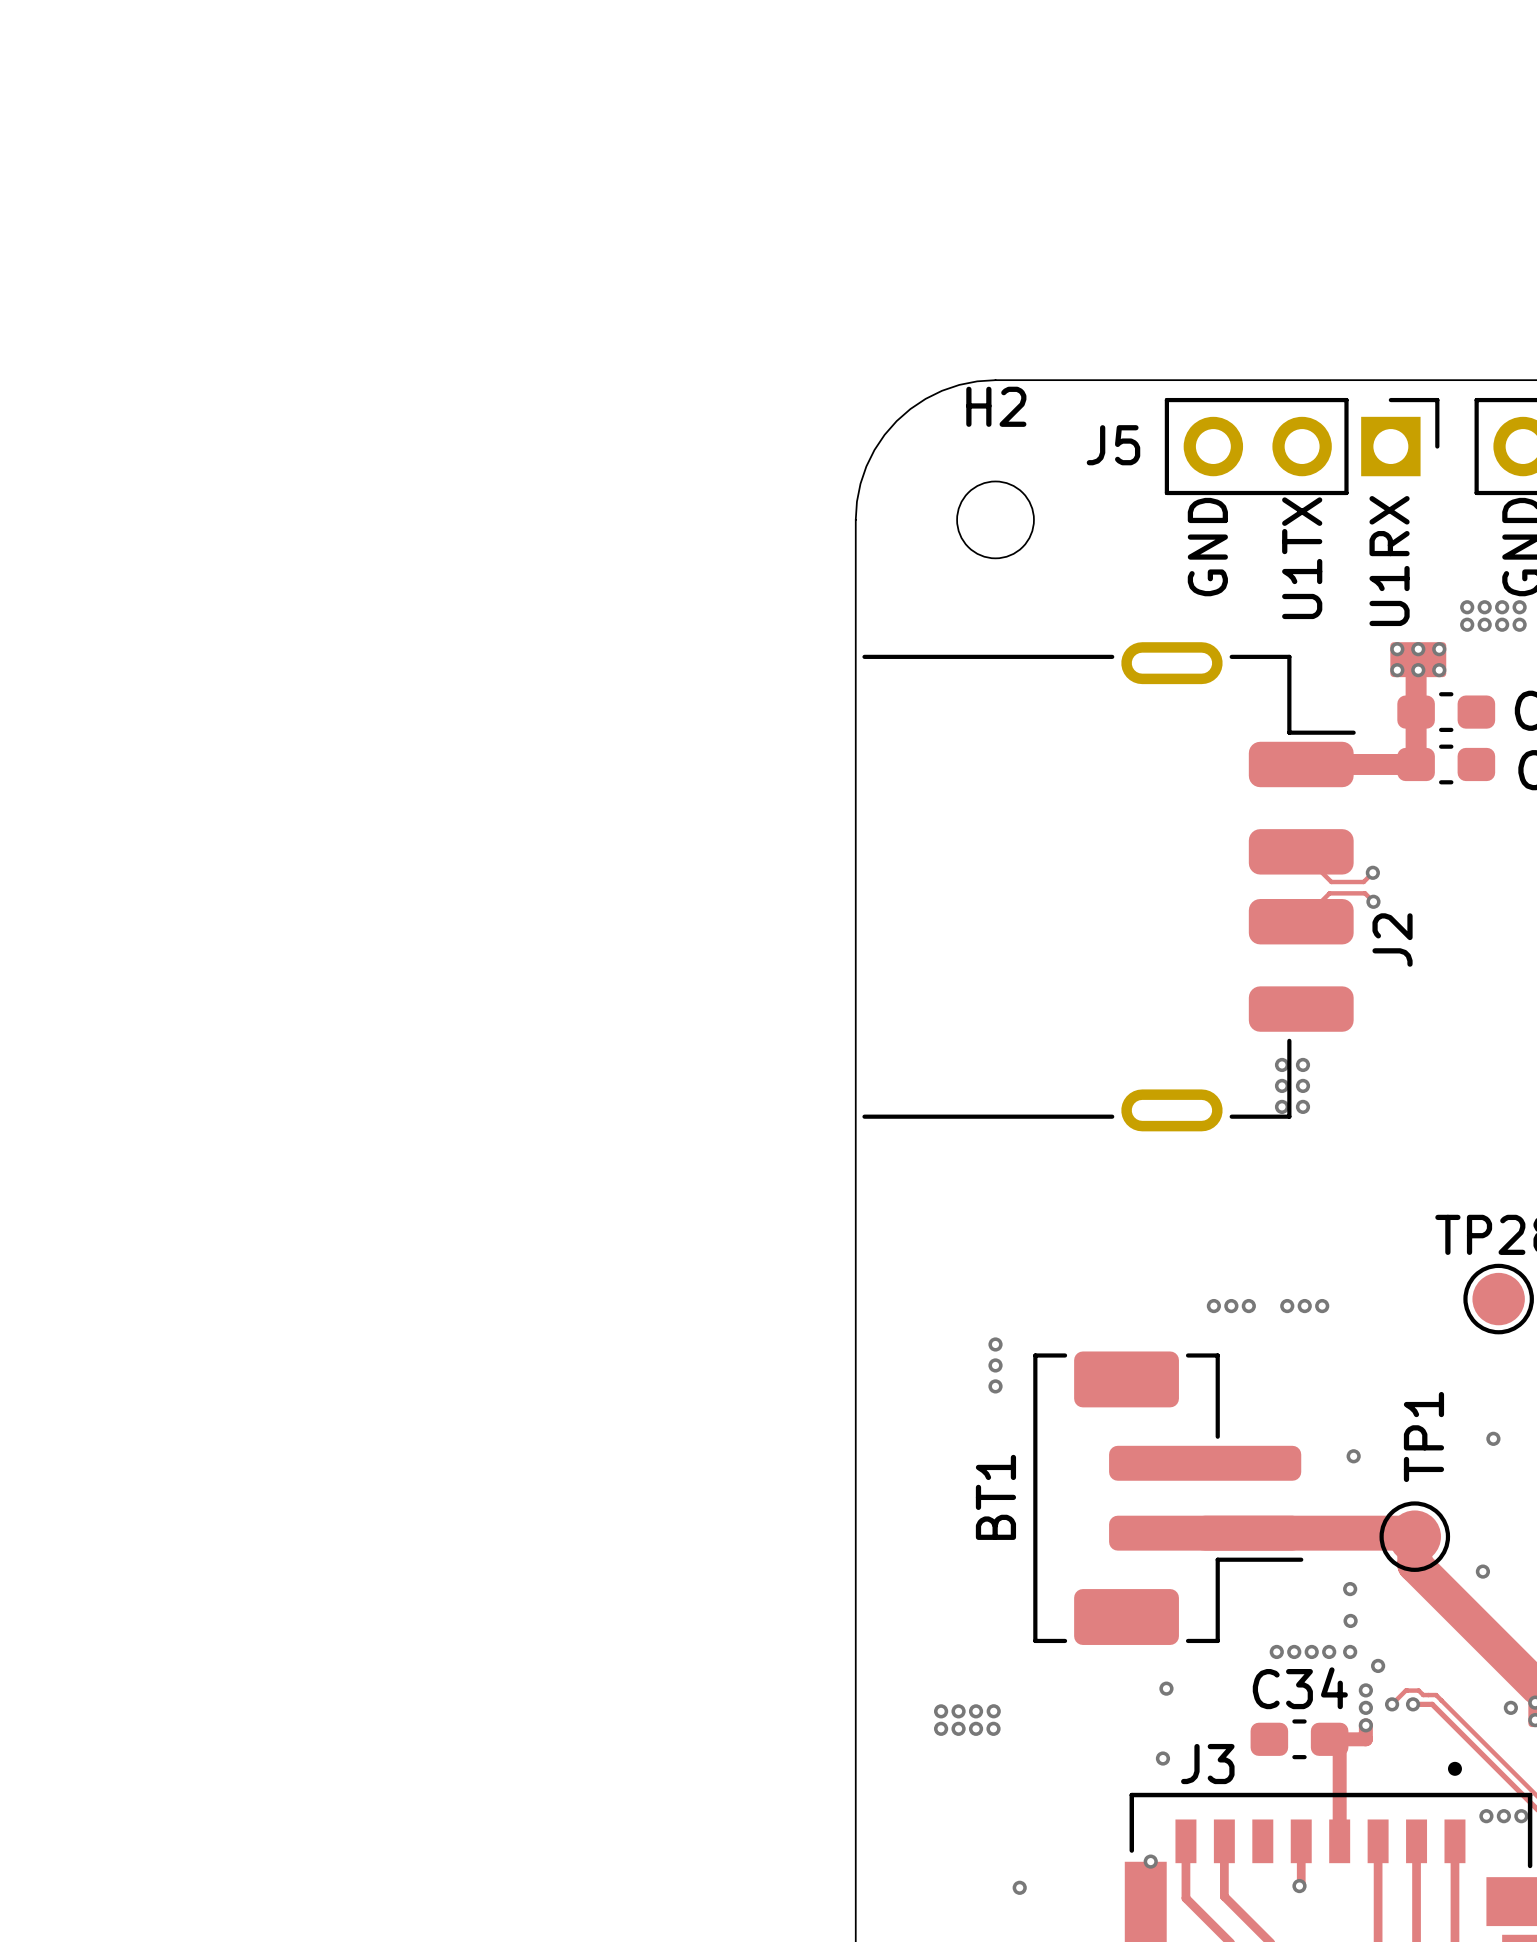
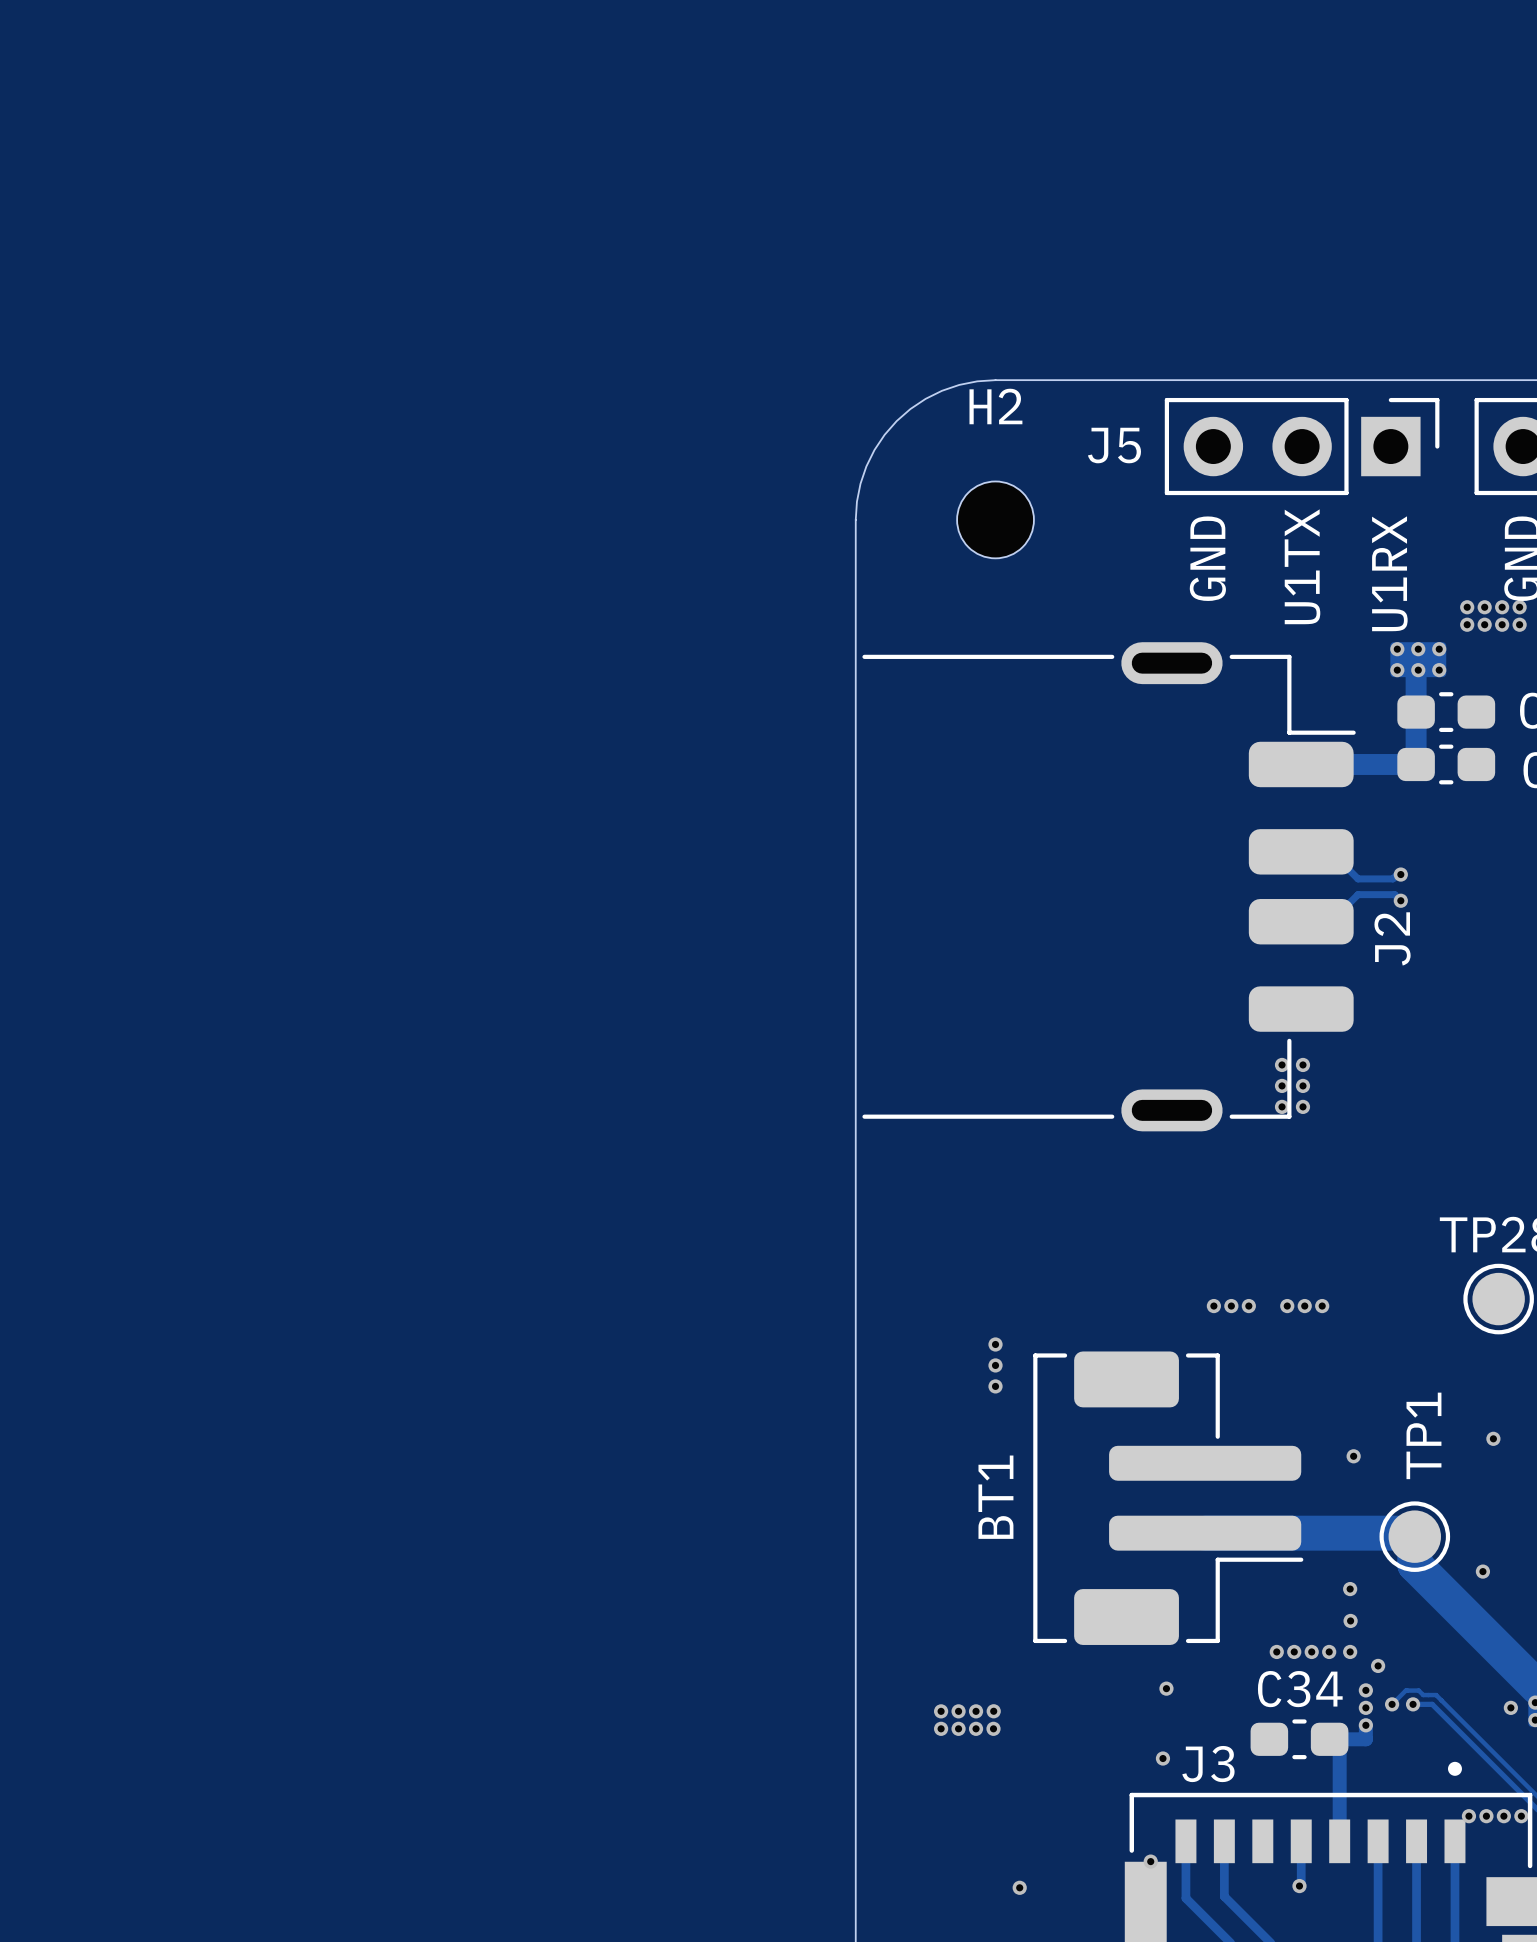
track: (1301, 851) (1331, 882) (1363, 882) (1372, 872) -> none
track: none -> (1330, 851) (1358, 878) (1392, 878) (1397, 874) (1400, 874)
via: (1372, 872) -> none
via: none -> (1400, 874)
track: (1373, 900) (1365, 893) (1329, 893) (1301, 921) -> none
track: none -> (1400, 900) (1394, 894) (1358, 894) (1330, 921)
via: none -> (1400, 900)
via: (1373, 901) -> none
via: none -> (1468, 1816)

